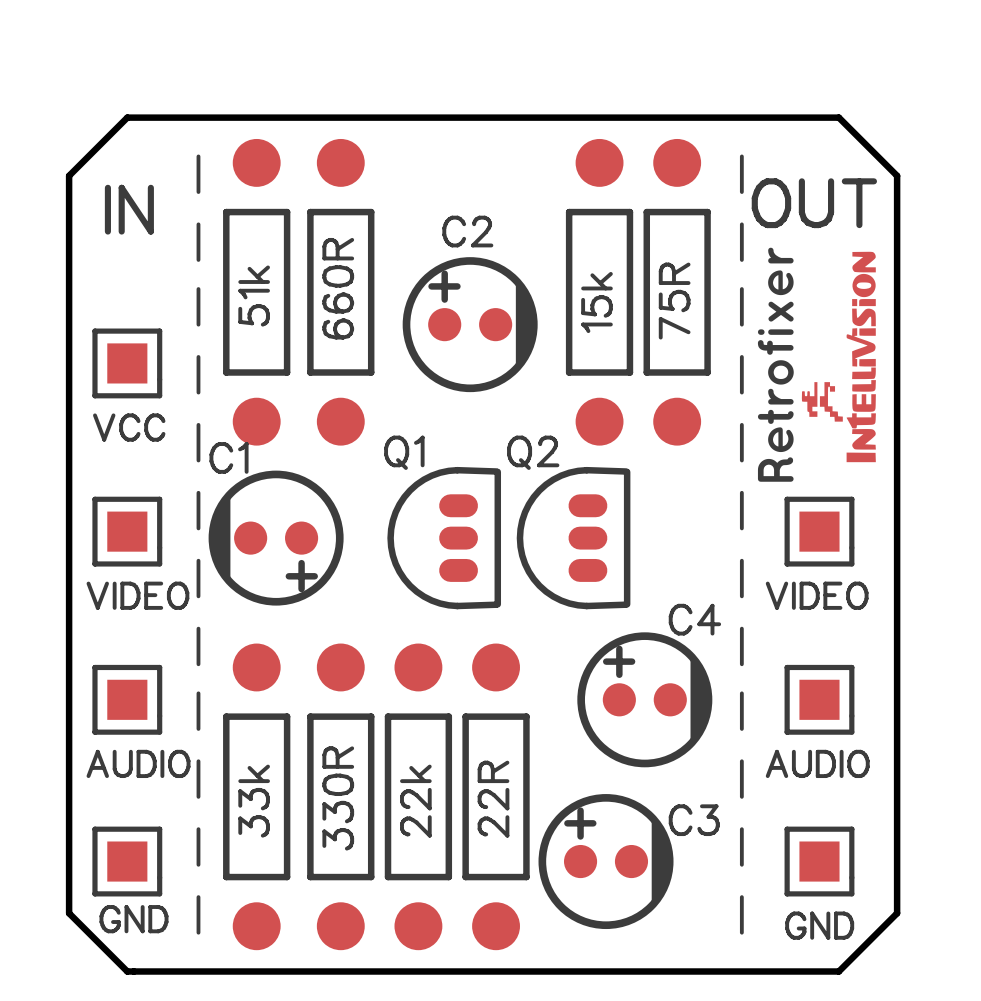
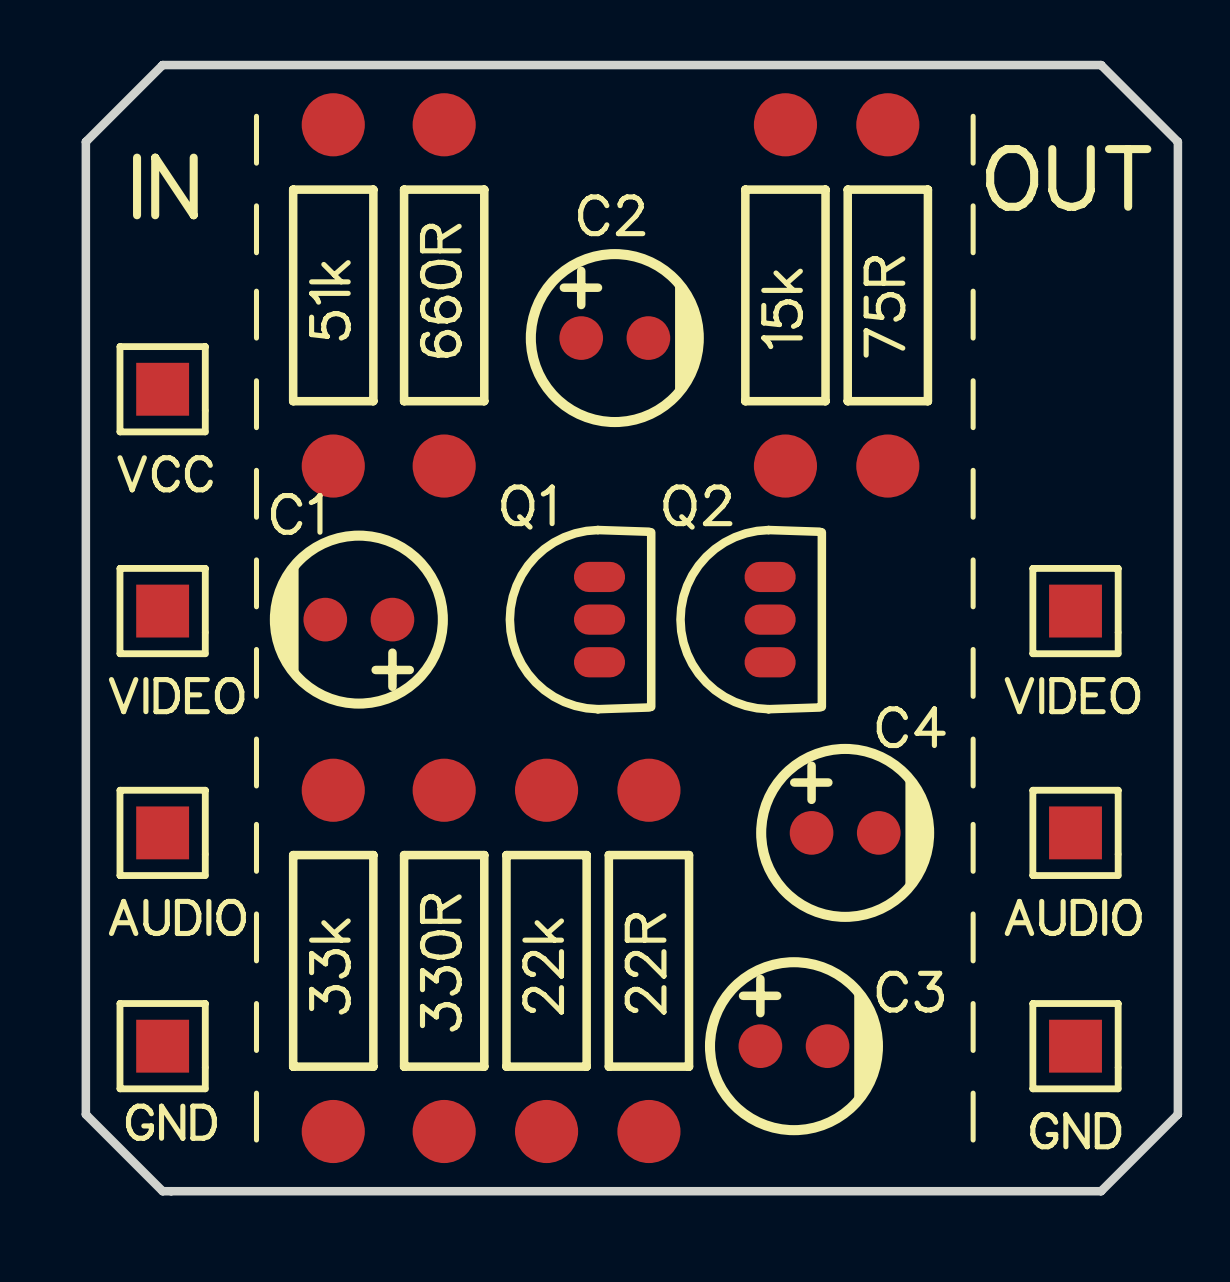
drawing: [757, 247, 876, 482] -> none

